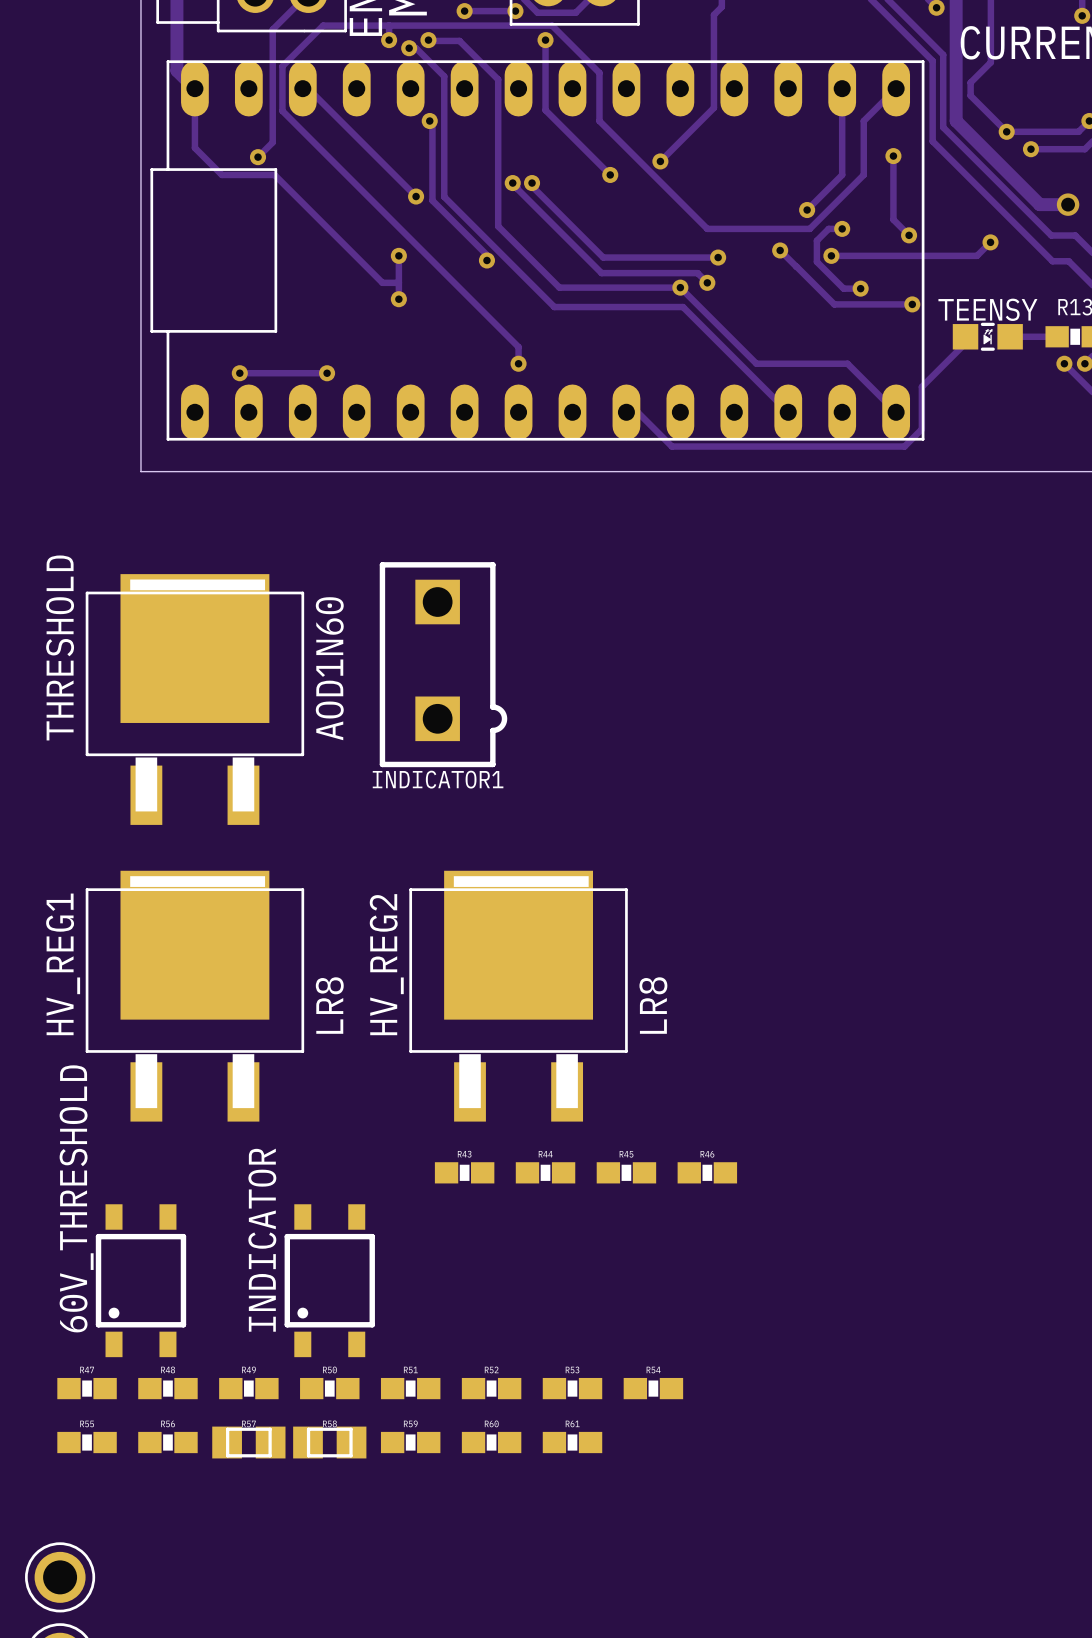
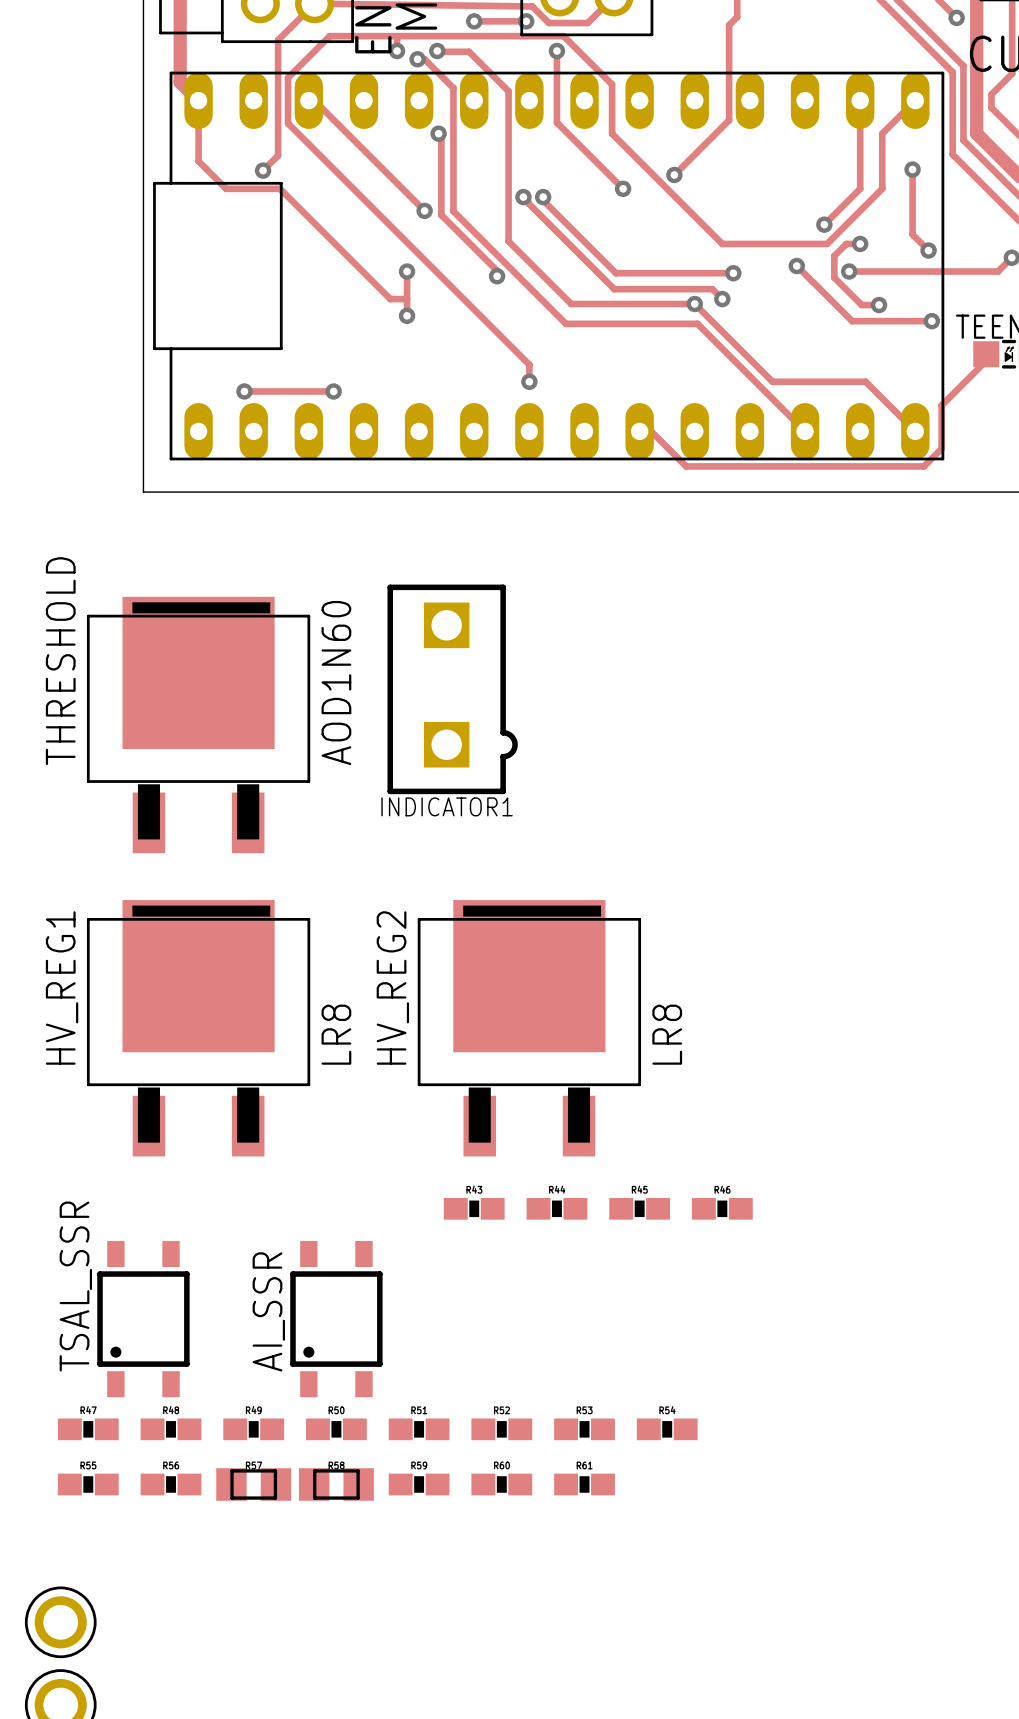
60V_THRESHOLD name: 60V_THRESHOLD (76, 1198) -> TSAL_SSR (75, 1286)
INDICATOR name: INDICATOR (262, 1240) -> AI_SSR (268, 1311)

